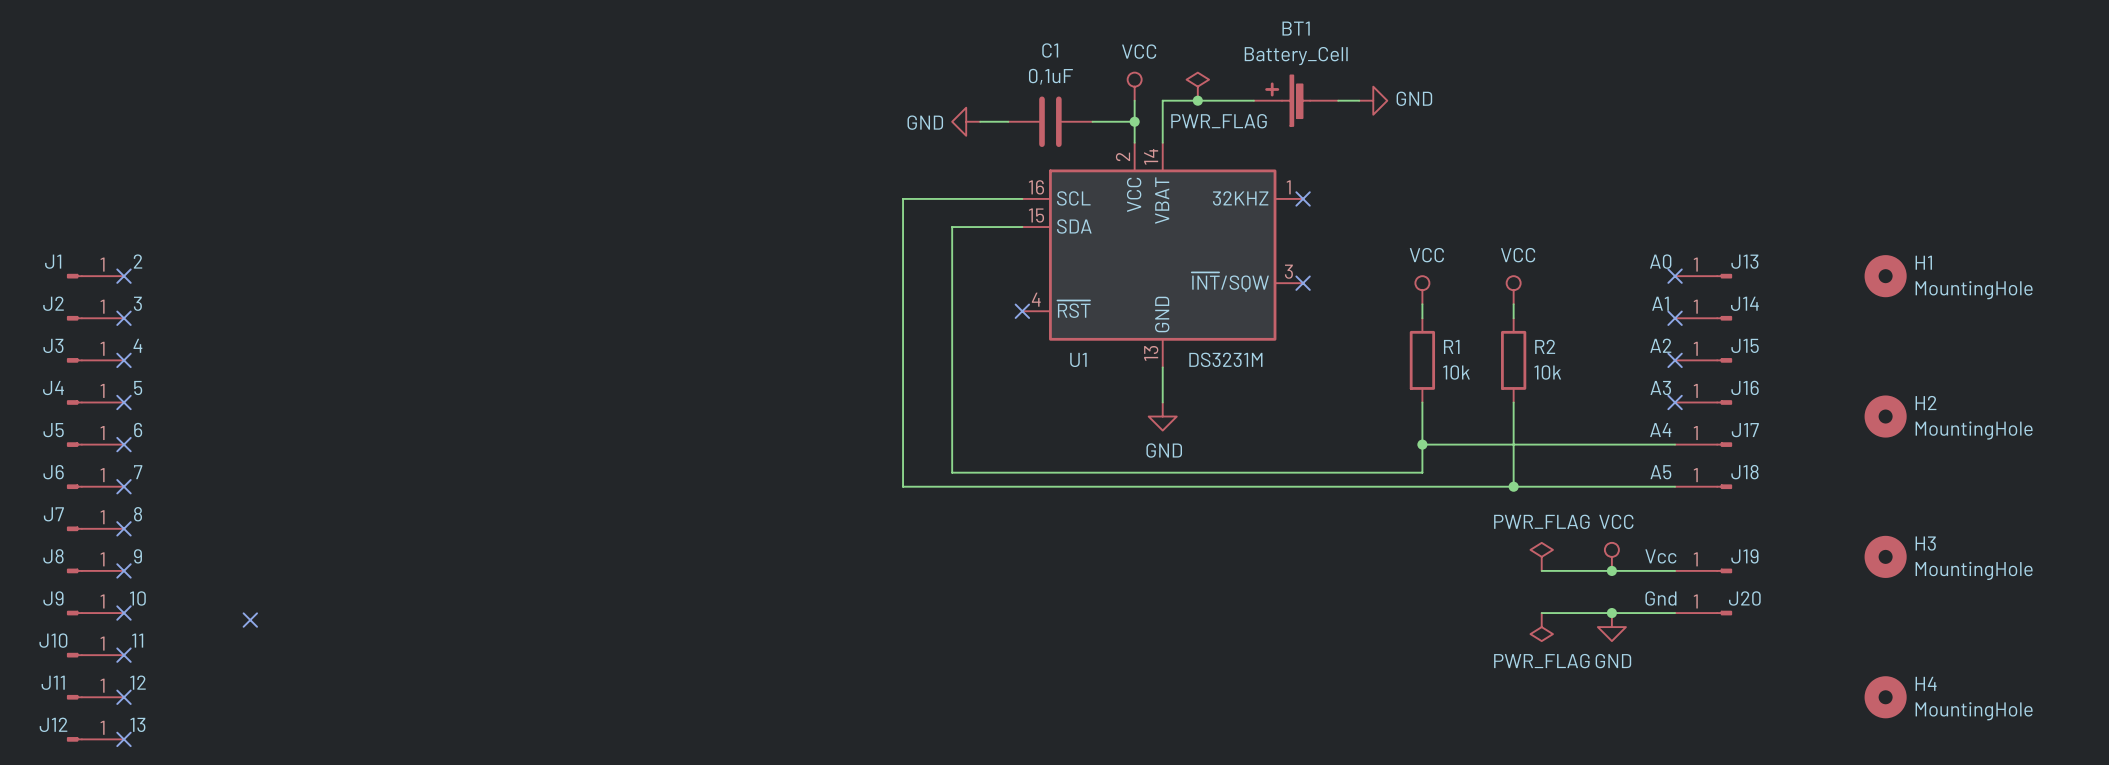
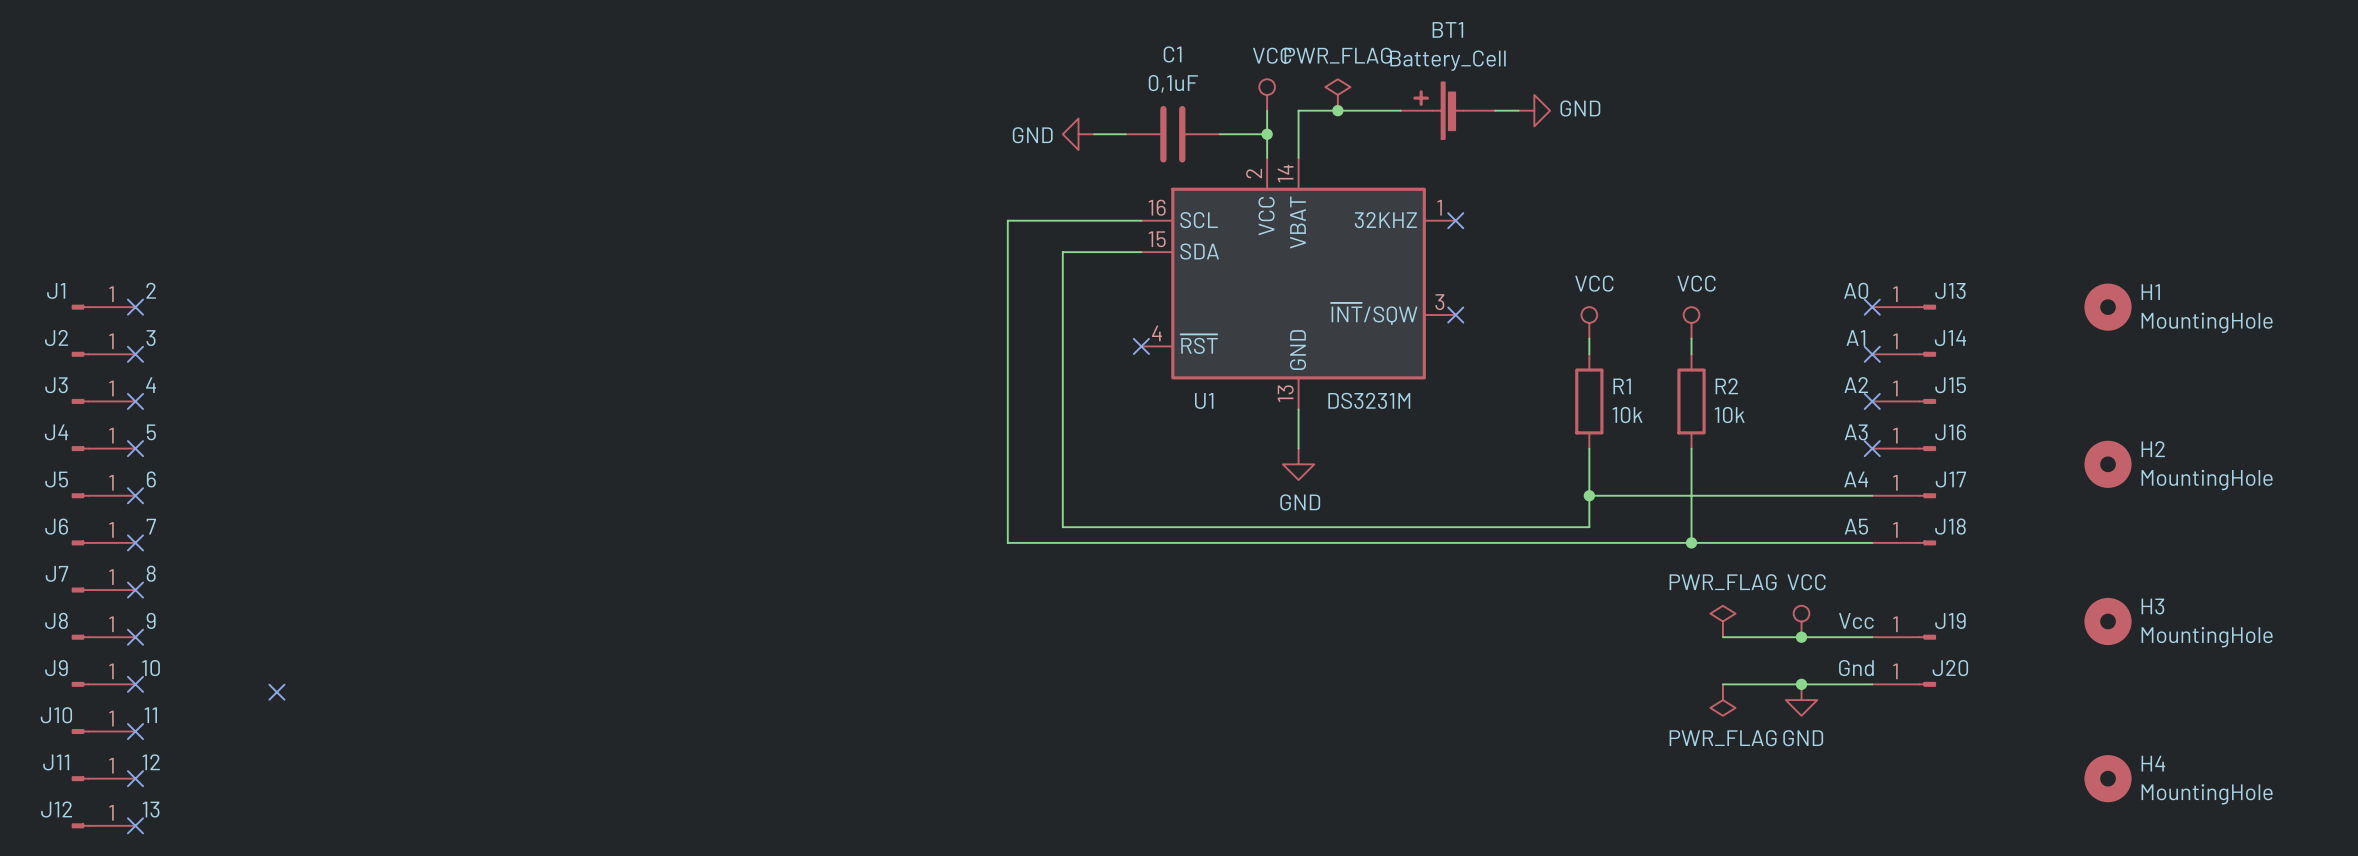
power symbol text position: PWR_FLAG (1219, 121) -> PWR_FLAG (1338, 55)

